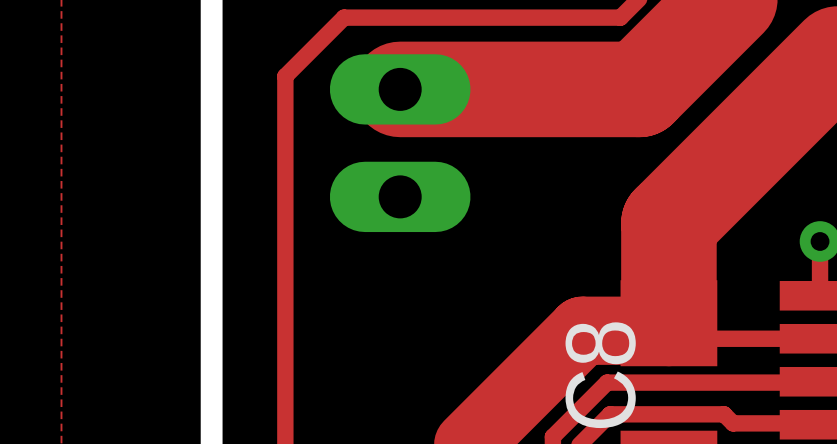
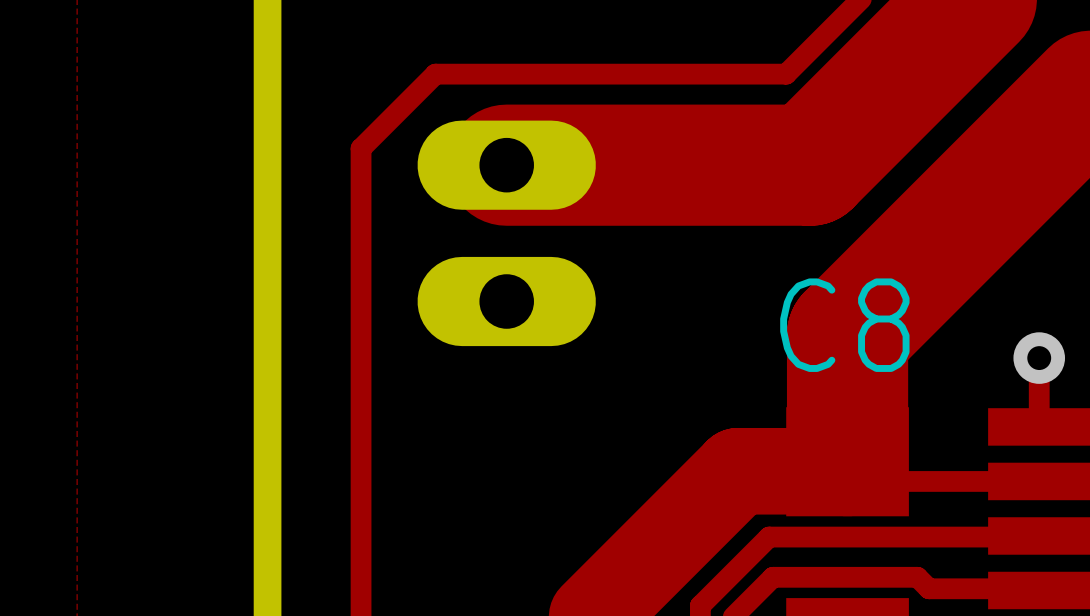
C8 name rotation: 0° (600, 375) -> 90° clockwise (844, 325)

